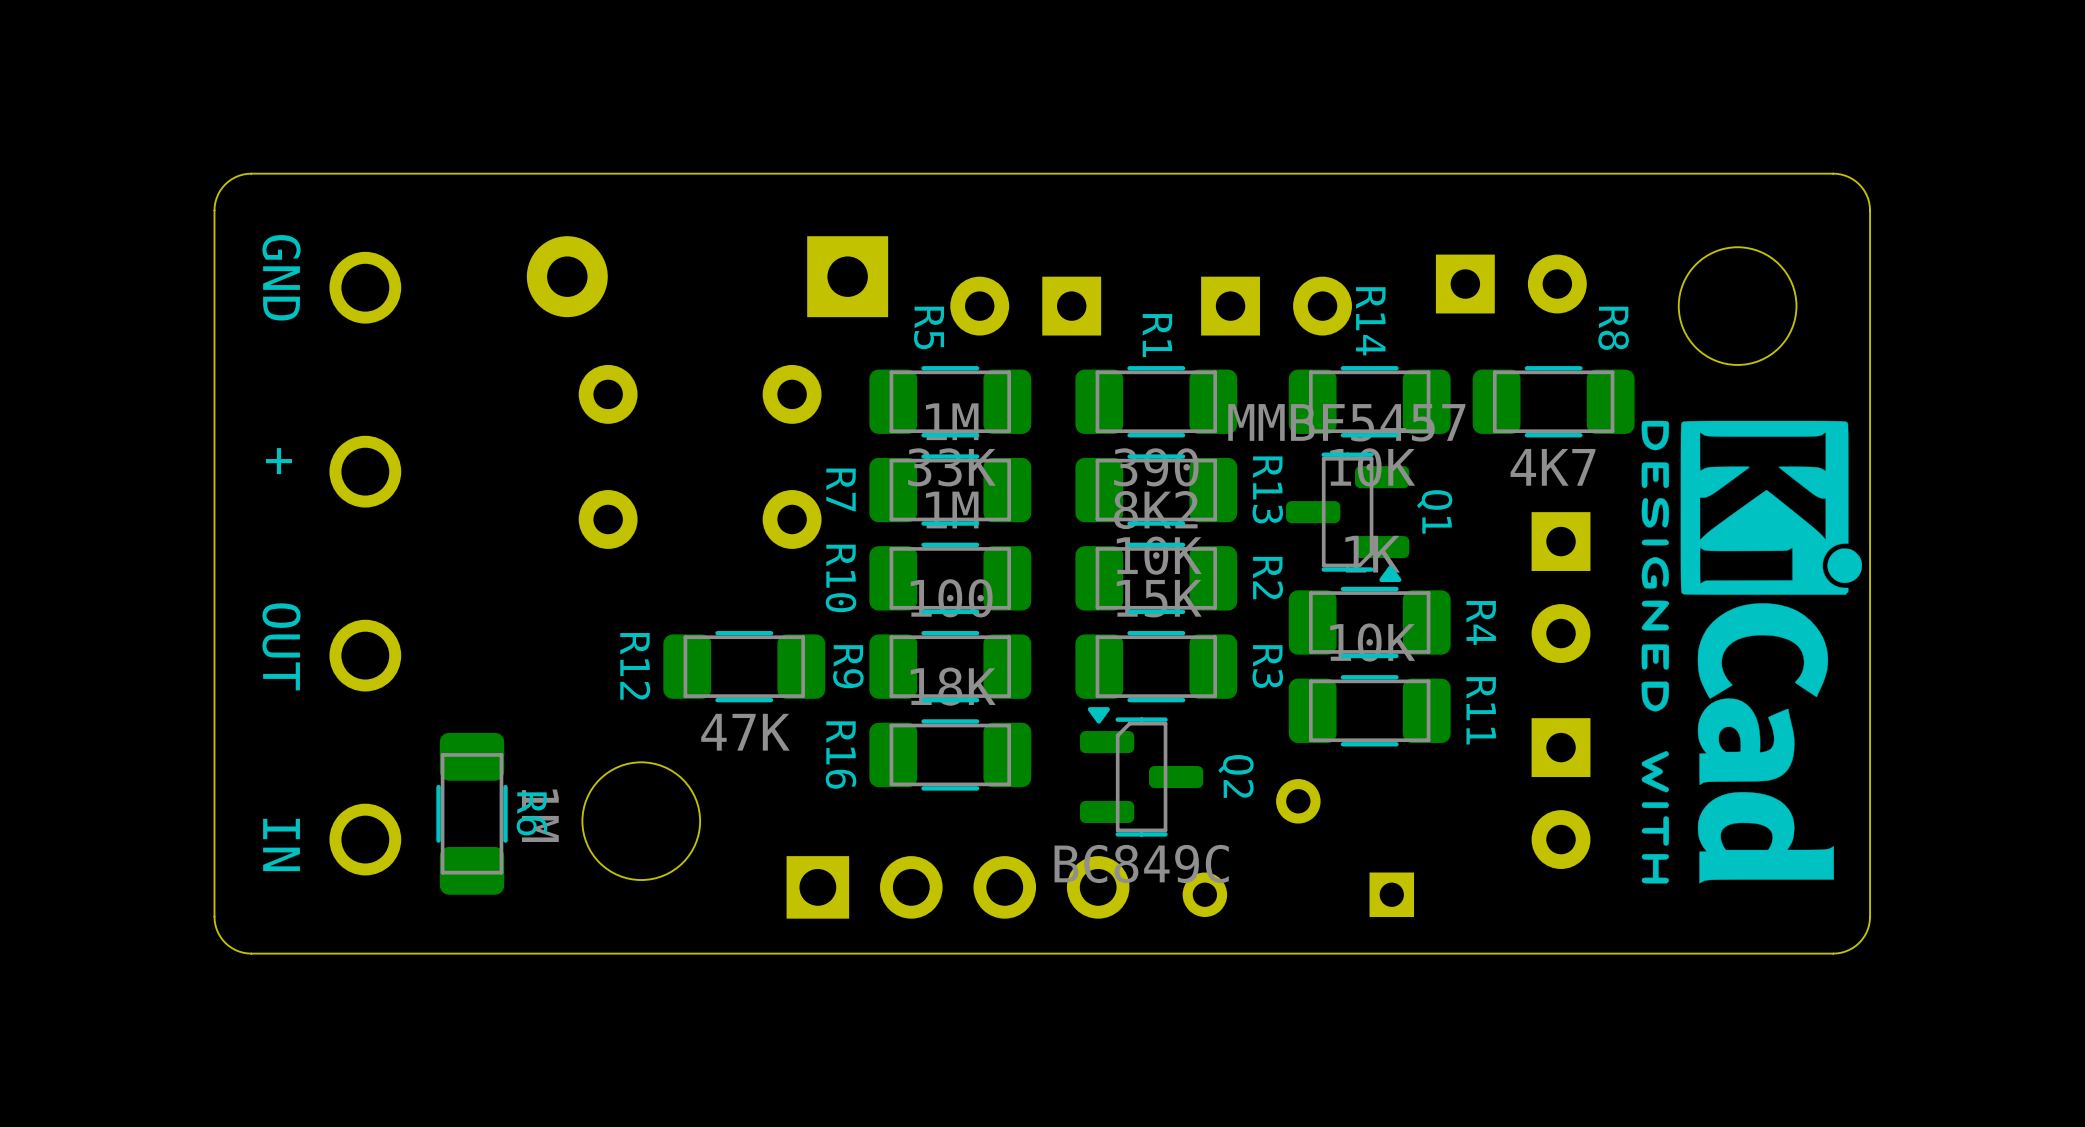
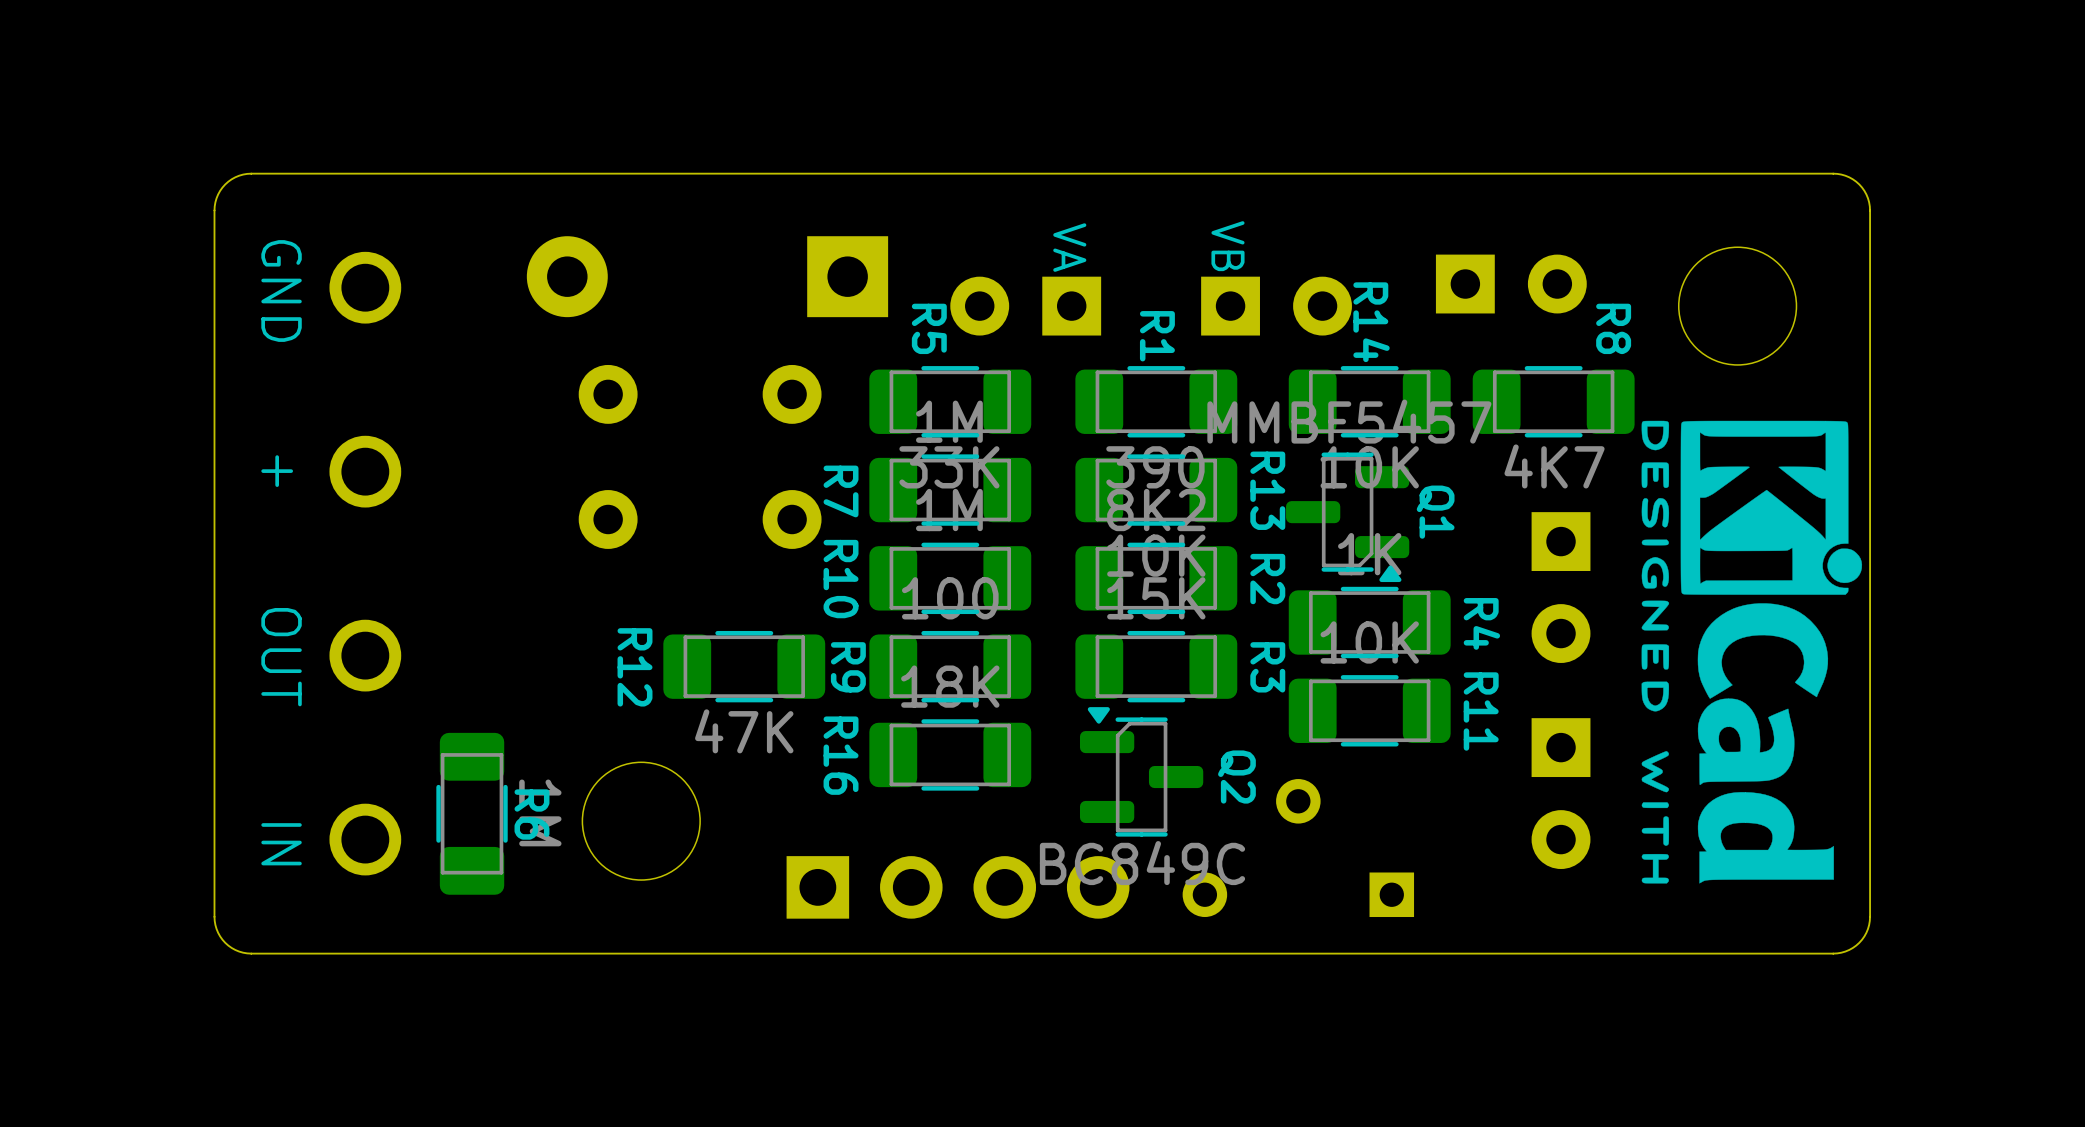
text: none -> VB (1227, 246)
text: none -> VA (1069, 247)

